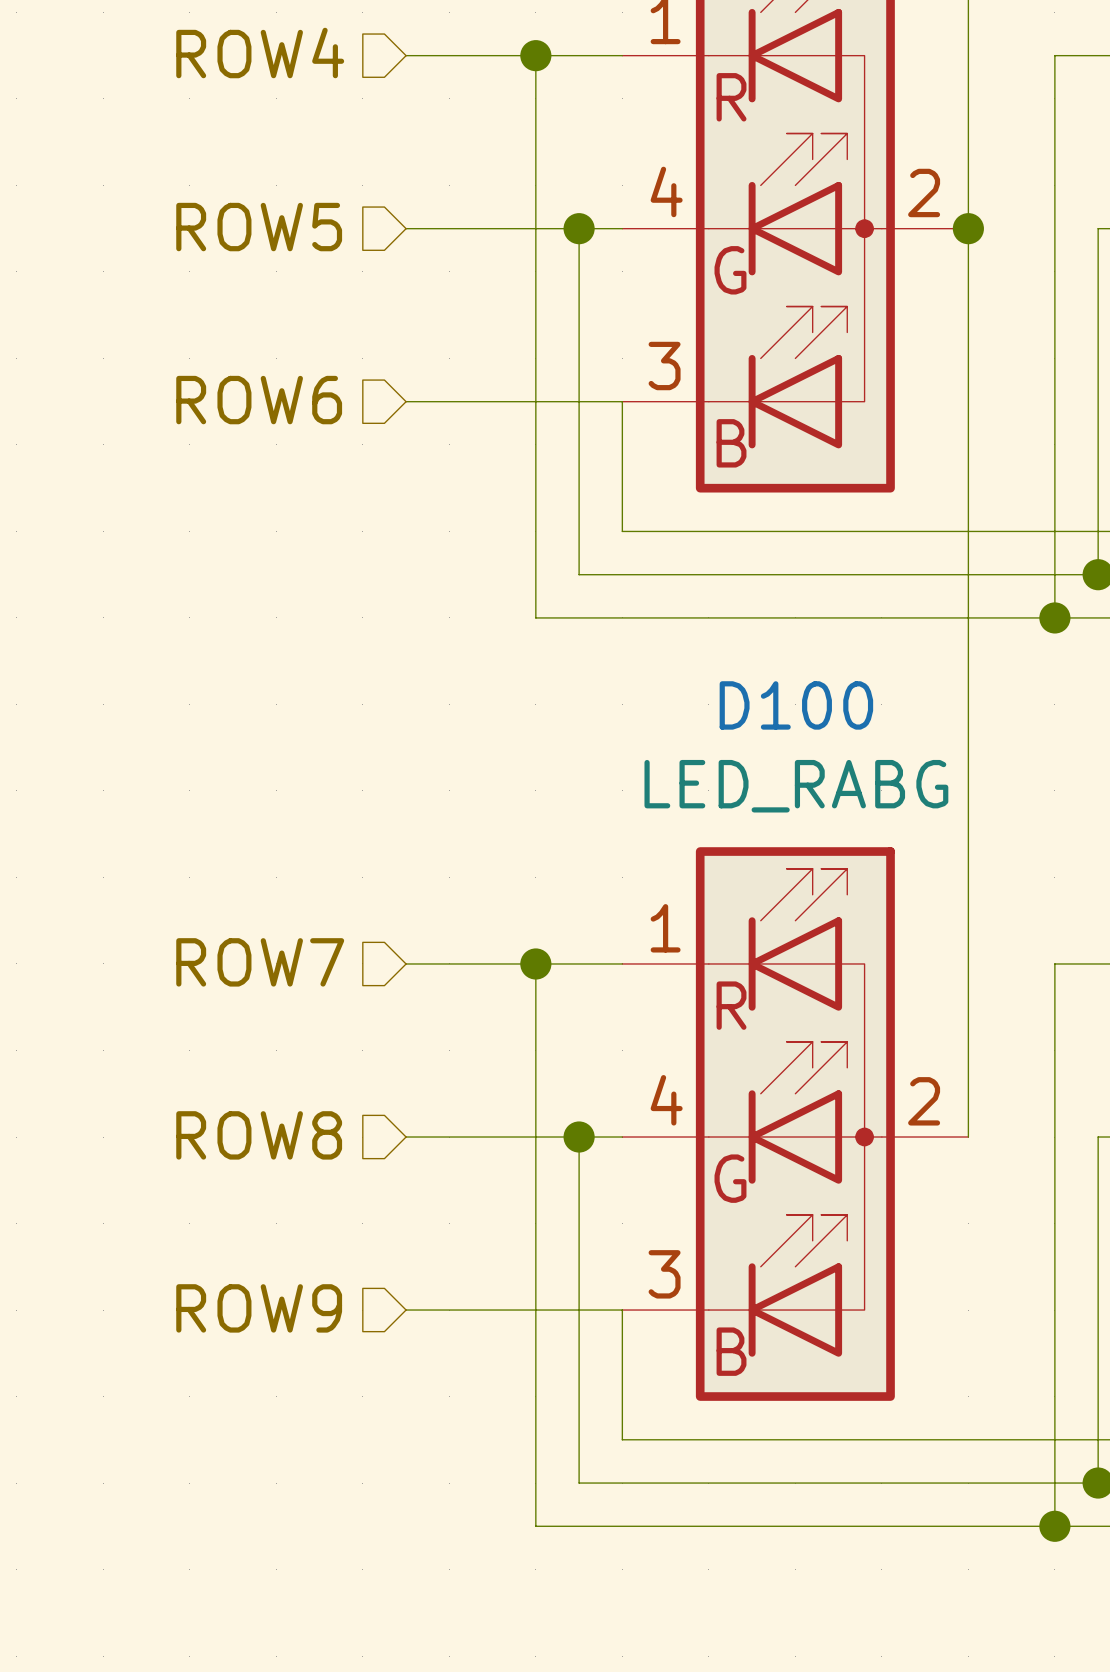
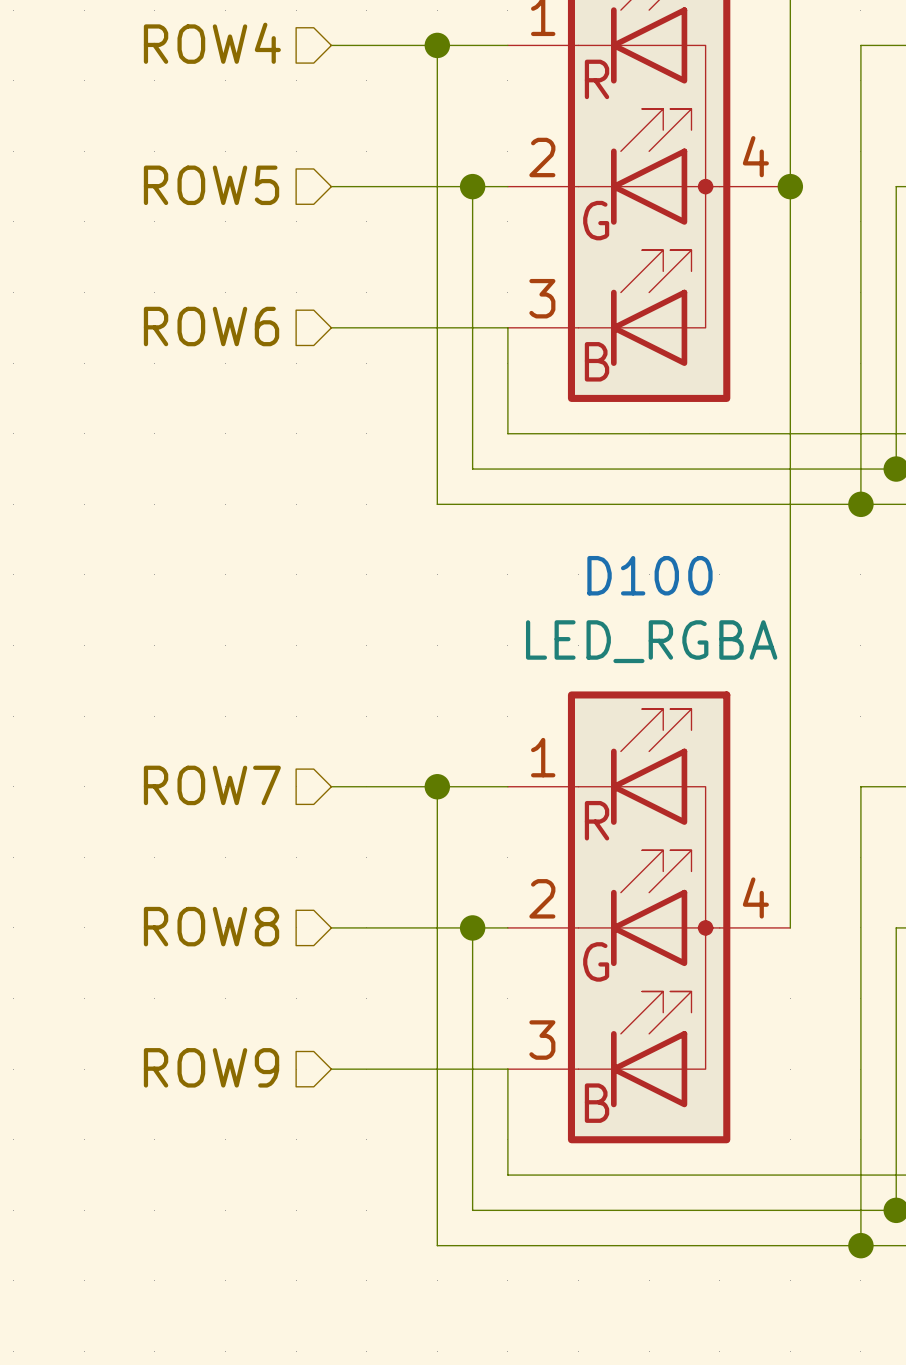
part pin number: 4 (666, 191) -> 2 (542, 157)
part pin number: 2 (924, 192) -> 4 (755, 156)
D100 value: LED_RABG (796, 786) -> LED_RGBA (651, 641)
D100 pin number: 4 (666, 1100) -> 2 (542, 898)
D100 pin number: 2 (924, 1101) -> 4 (755, 897)

